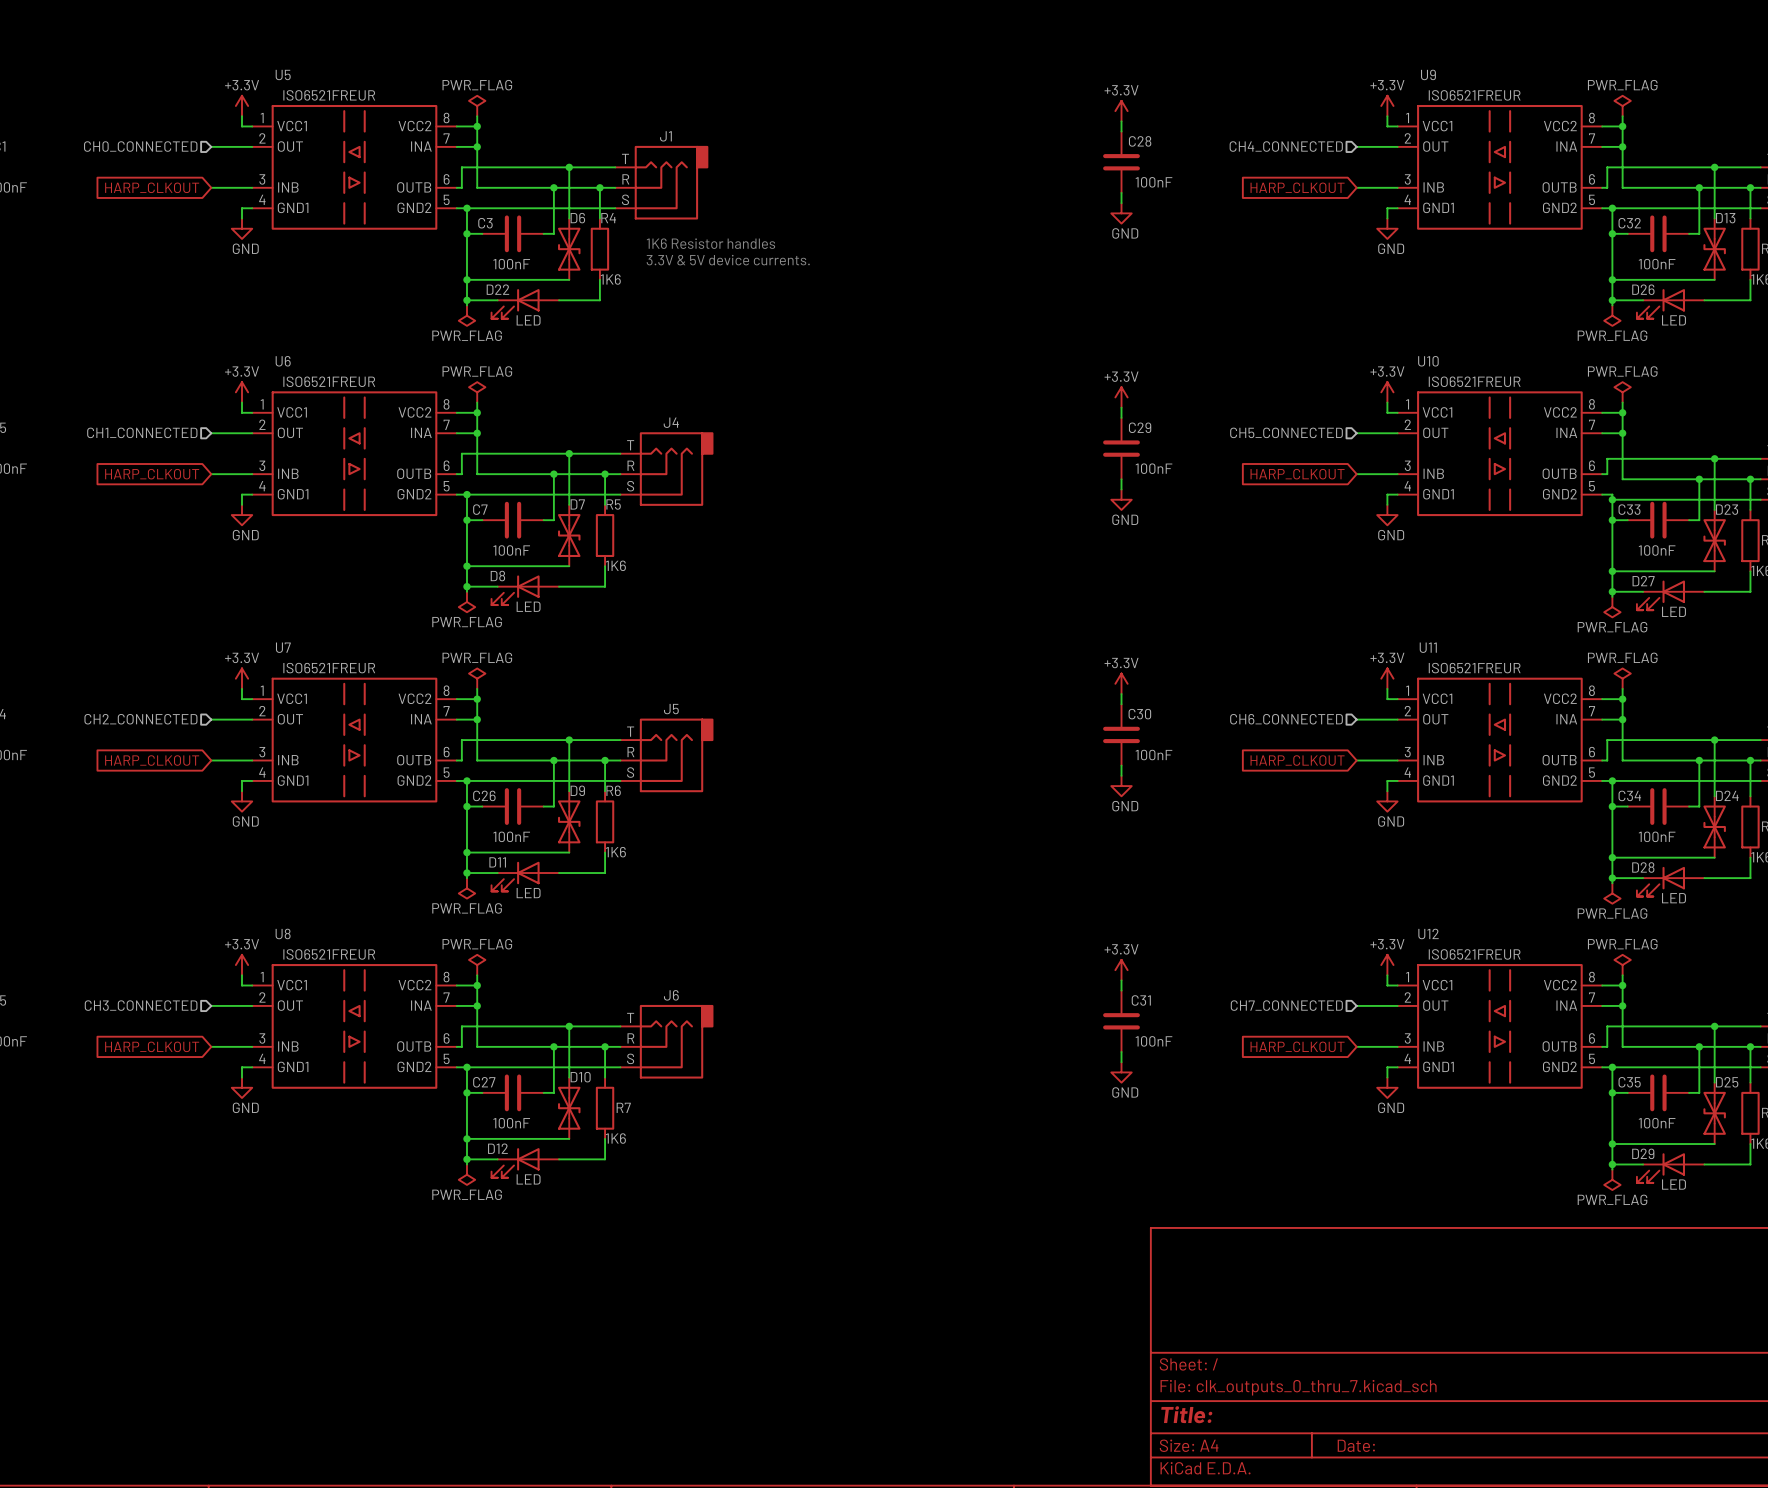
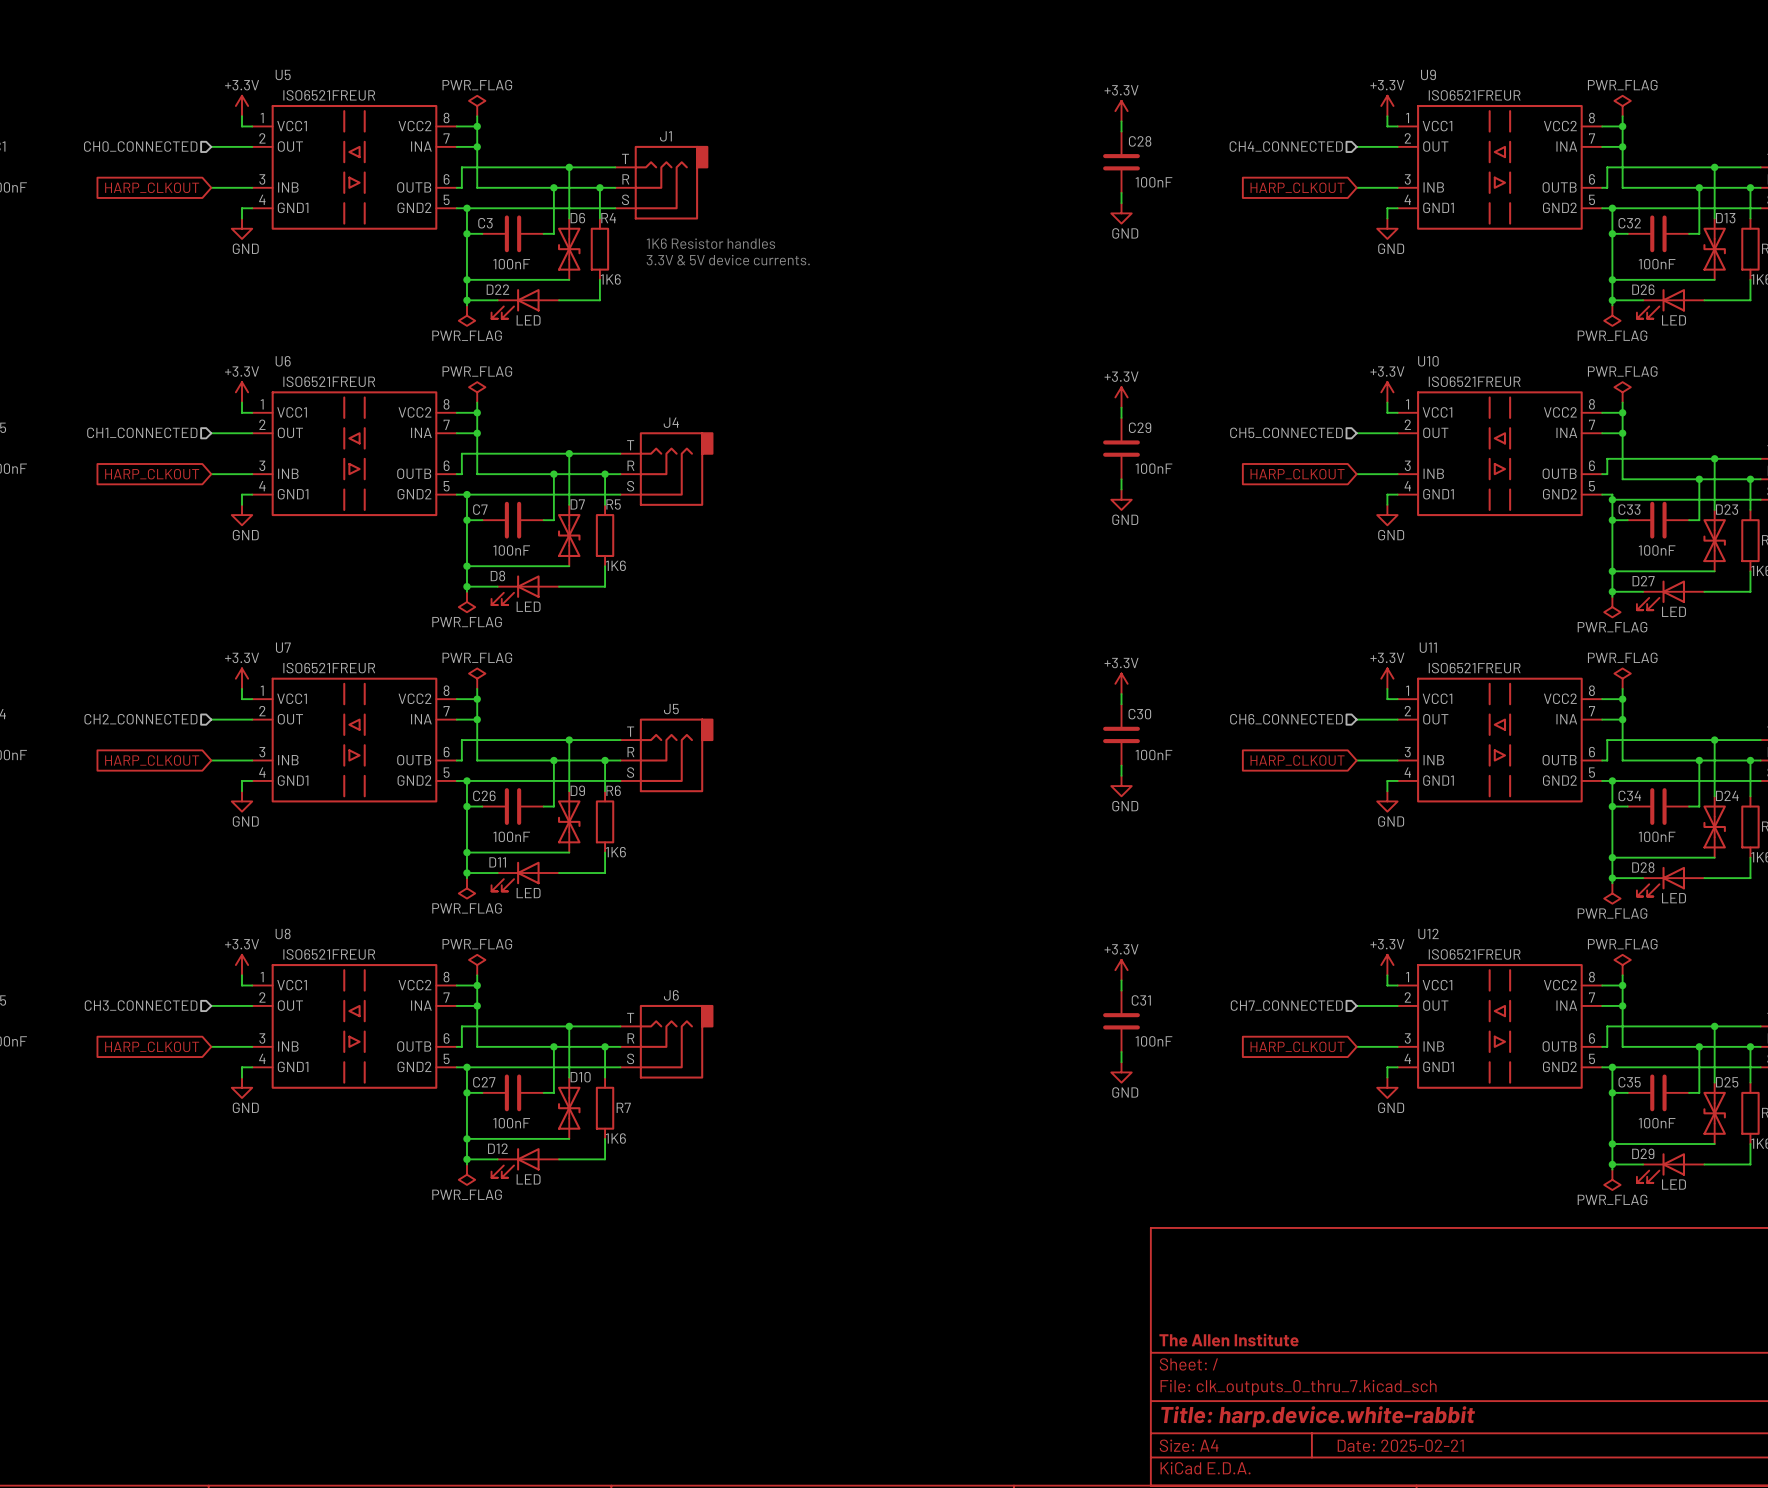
title block: none -> The Allen Institute (1228, 1340)
title block: Title: (1186, 1414) -> Title: harp.device.white-rabbit (1318, 1416)
title block: Date: (1356, 1445) -> Date: 2025-02-21 (1400, 1445)

